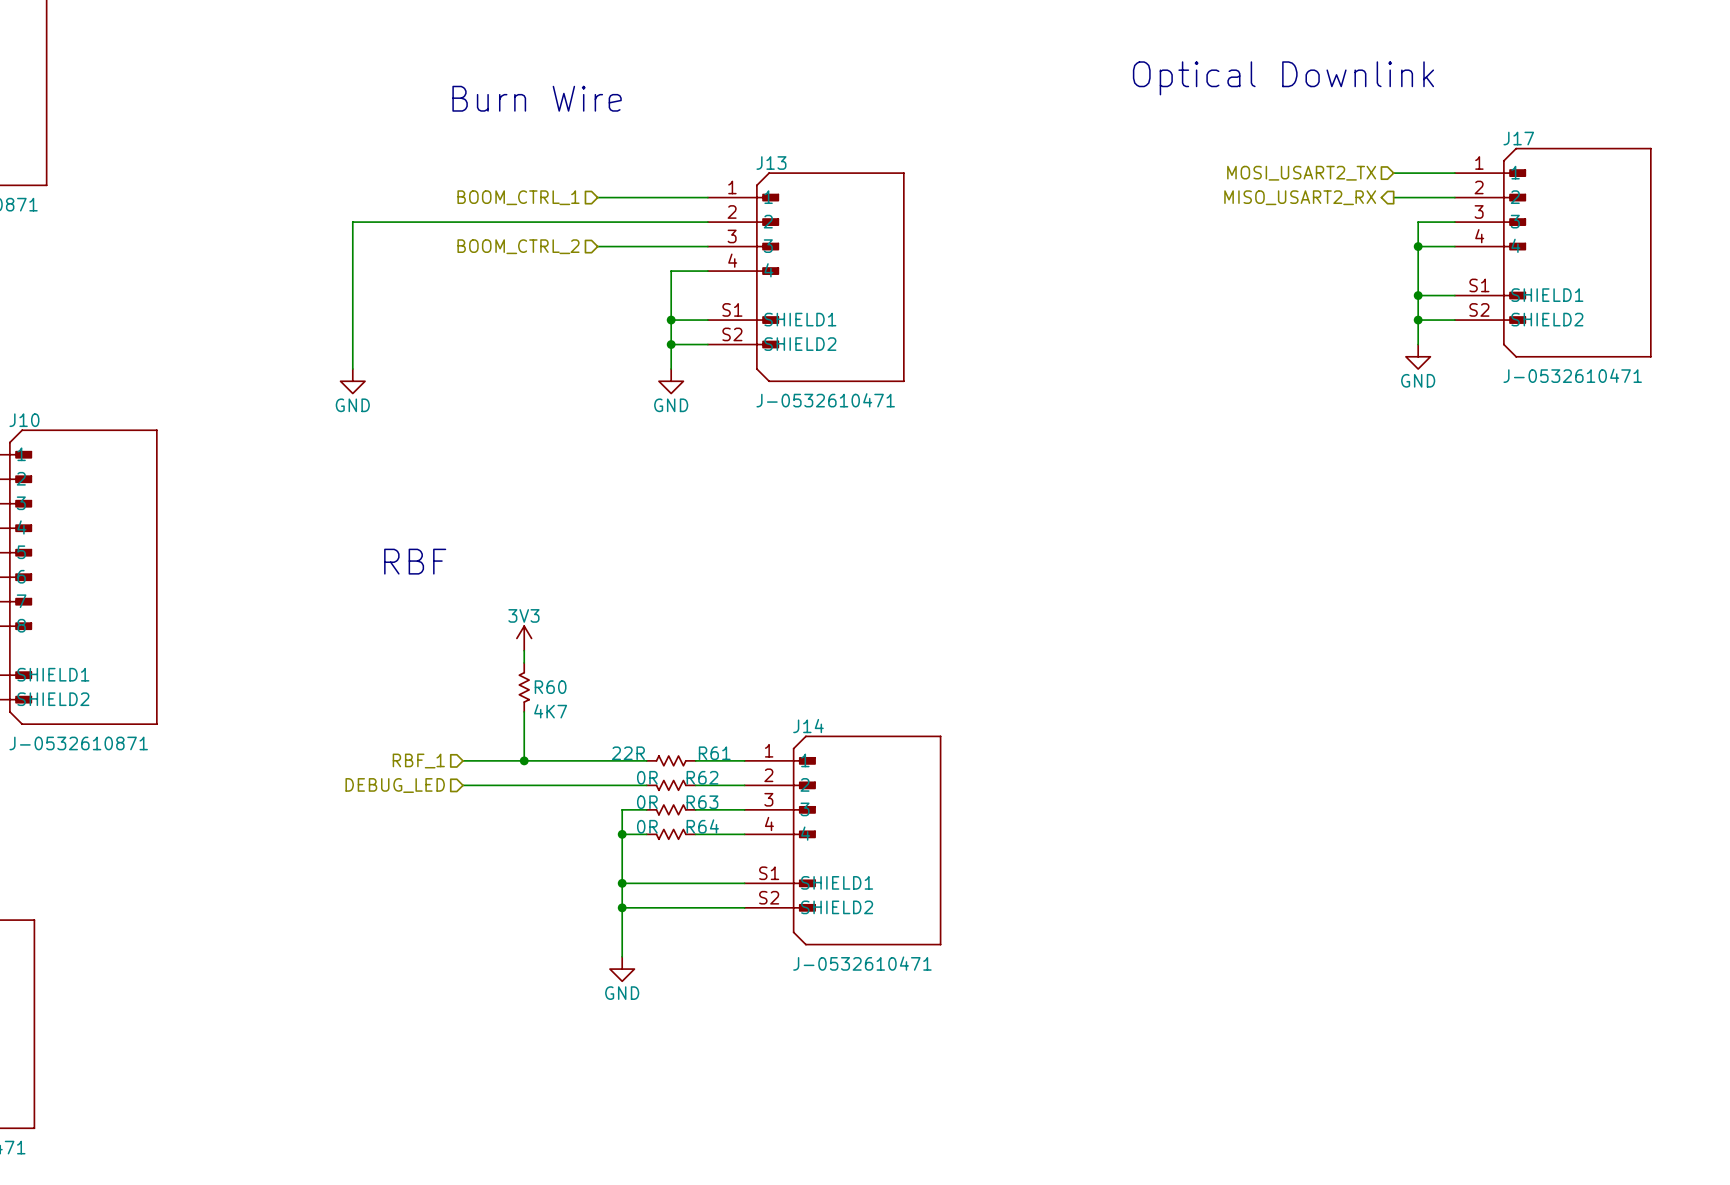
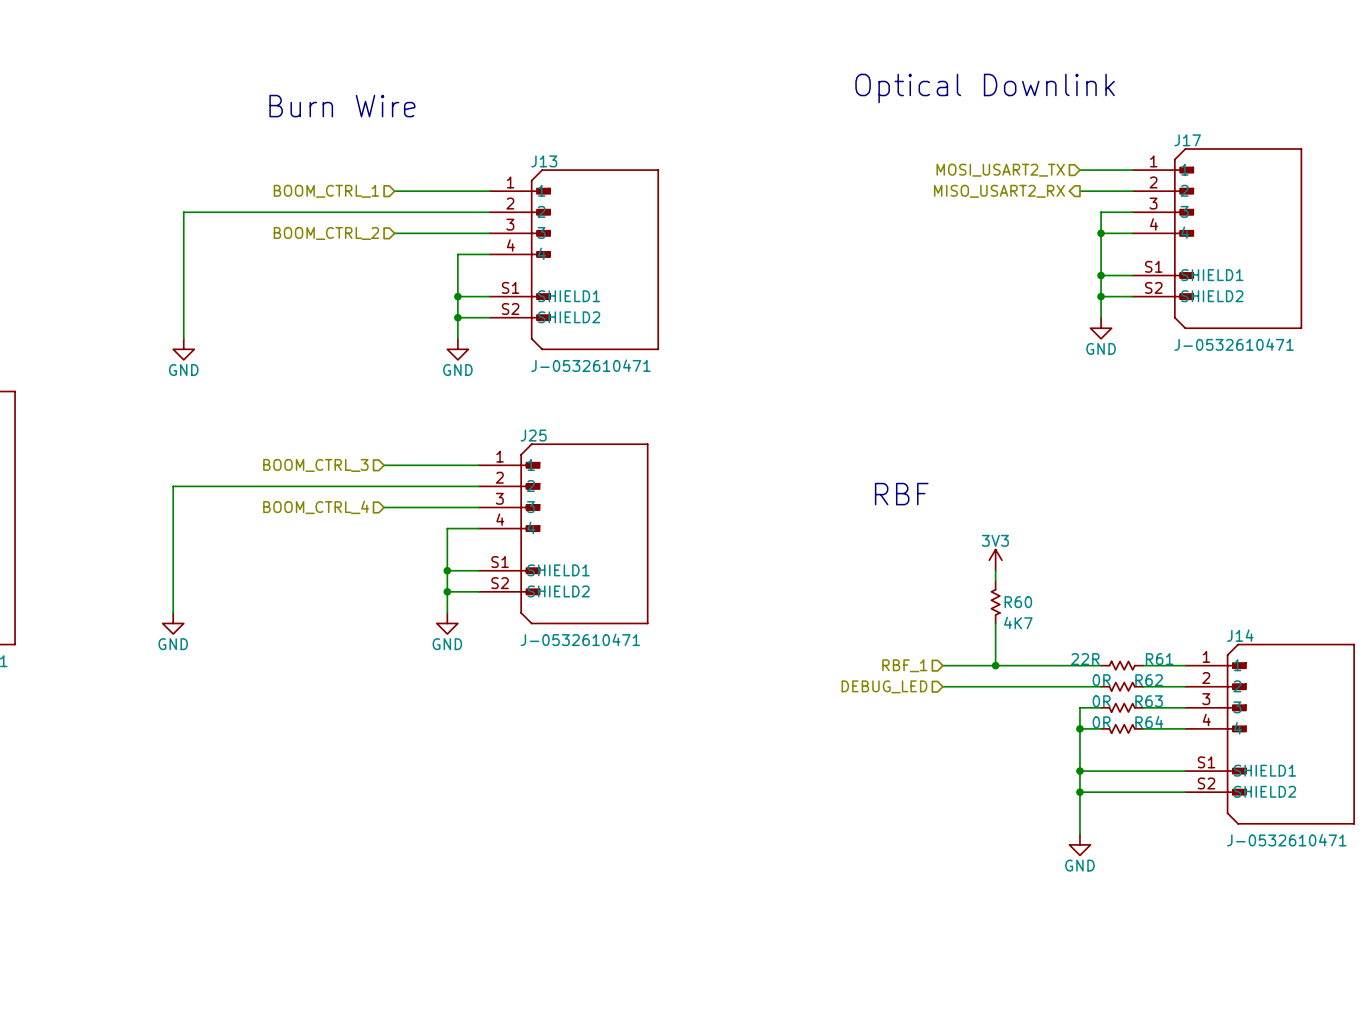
wire: none -> (384, 465) (478, 465)
hierarchical label: none -> BOOM_CTRL_3 (315, 465)
wire: none -> (478, 486) (173, 486) (173, 612)
text: none -> RBF (901, 494)
text: RBF (415, 561) -> none
hierarchical label: none -> BOOM_CTRL_4 (316, 507)
wire: none -> (384, 507) (478, 507)
wire: none -> (478, 528) (447, 528) (447, 612)
J25: none -> J-0532610471 (563, 533)
power symbol: none -> 3V3 (995, 560)
power symbol: 3V3 (524, 638) -> none
wire: none -> (447, 570) (478, 570)
junction: none -> (447, 570)
wire: none -> (995, 570) (995, 581)
wire: (524, 650) (524, 662) -> none
wire: none -> (447, 591) (478, 591)
junction: none -> (447, 591)
R60 position: (524, 687) -> (995, 602)
power symbol: none -> GND (173, 623)
power symbol: none -> GND (447, 623)
wire: none -> (995, 623) (995, 665)
wire: (524, 711) (524, 760) -> none
hierarchical label: none -> RBF_1 (904, 665)
wire: none -> (942, 665) (1101, 665)
junction: none -> (995, 665)
wire: none -> (1143, 665) (1185, 665)
wire: (463, 760) (646, 760) -> none
junction: (524, 760) -> none
R61 position: (671, 760) -> (1122, 665)
wire: (695, 760) (744, 760) -> none
hierarchical label: RBF_1 (418, 761) -> none
hierarchical label: none -> DEBUG_LED (884, 686)
wire: none -> (942, 686) (1101, 686)
wire: none -> (1143, 686) (1185, 686)
hierarchical label: DEBUG_LED (395, 785) -> none
wire: (463, 785) (646, 785) -> none
R62 position: (671, 785) -> (1122, 686)
wire: (695, 785) (744, 785) -> none
wire: none -> (1101, 707) (1079, 707) (1079, 834)
wire: none -> (1143, 707) (1185, 707)
wire: (646, 809) (622, 809) (622, 956) -> none
R63 position: (671, 809) -> (1122, 707)
wire: (695, 809) (744, 809) -> none
wire: none -> (1079, 728) (1101, 728)
junction: none -> (1079, 728)
wire: none -> (1143, 728) (1185, 728)
wire: (622, 834) (646, 834) -> none
junction: (622, 834) -> none
R64 position: (671, 834) -> (1122, 728)
wire: (695, 834) (744, 834) -> none
J14 position: (842, 840) -> (1269, 734)
wire: none -> (1079, 771) (1185, 771)
junction: none -> (1079, 771)
wire: (622, 883) (744, 883) -> none
junction: (622, 883) -> none
wire: none -> (1079, 792) (1185, 792)
junction: none -> (1079, 792)
wire: (622, 907) (744, 907) -> none
junction: (622, 907) -> none
power symbol: none -> GND (1079, 844)
power symbol: GND (622, 969) -> none

